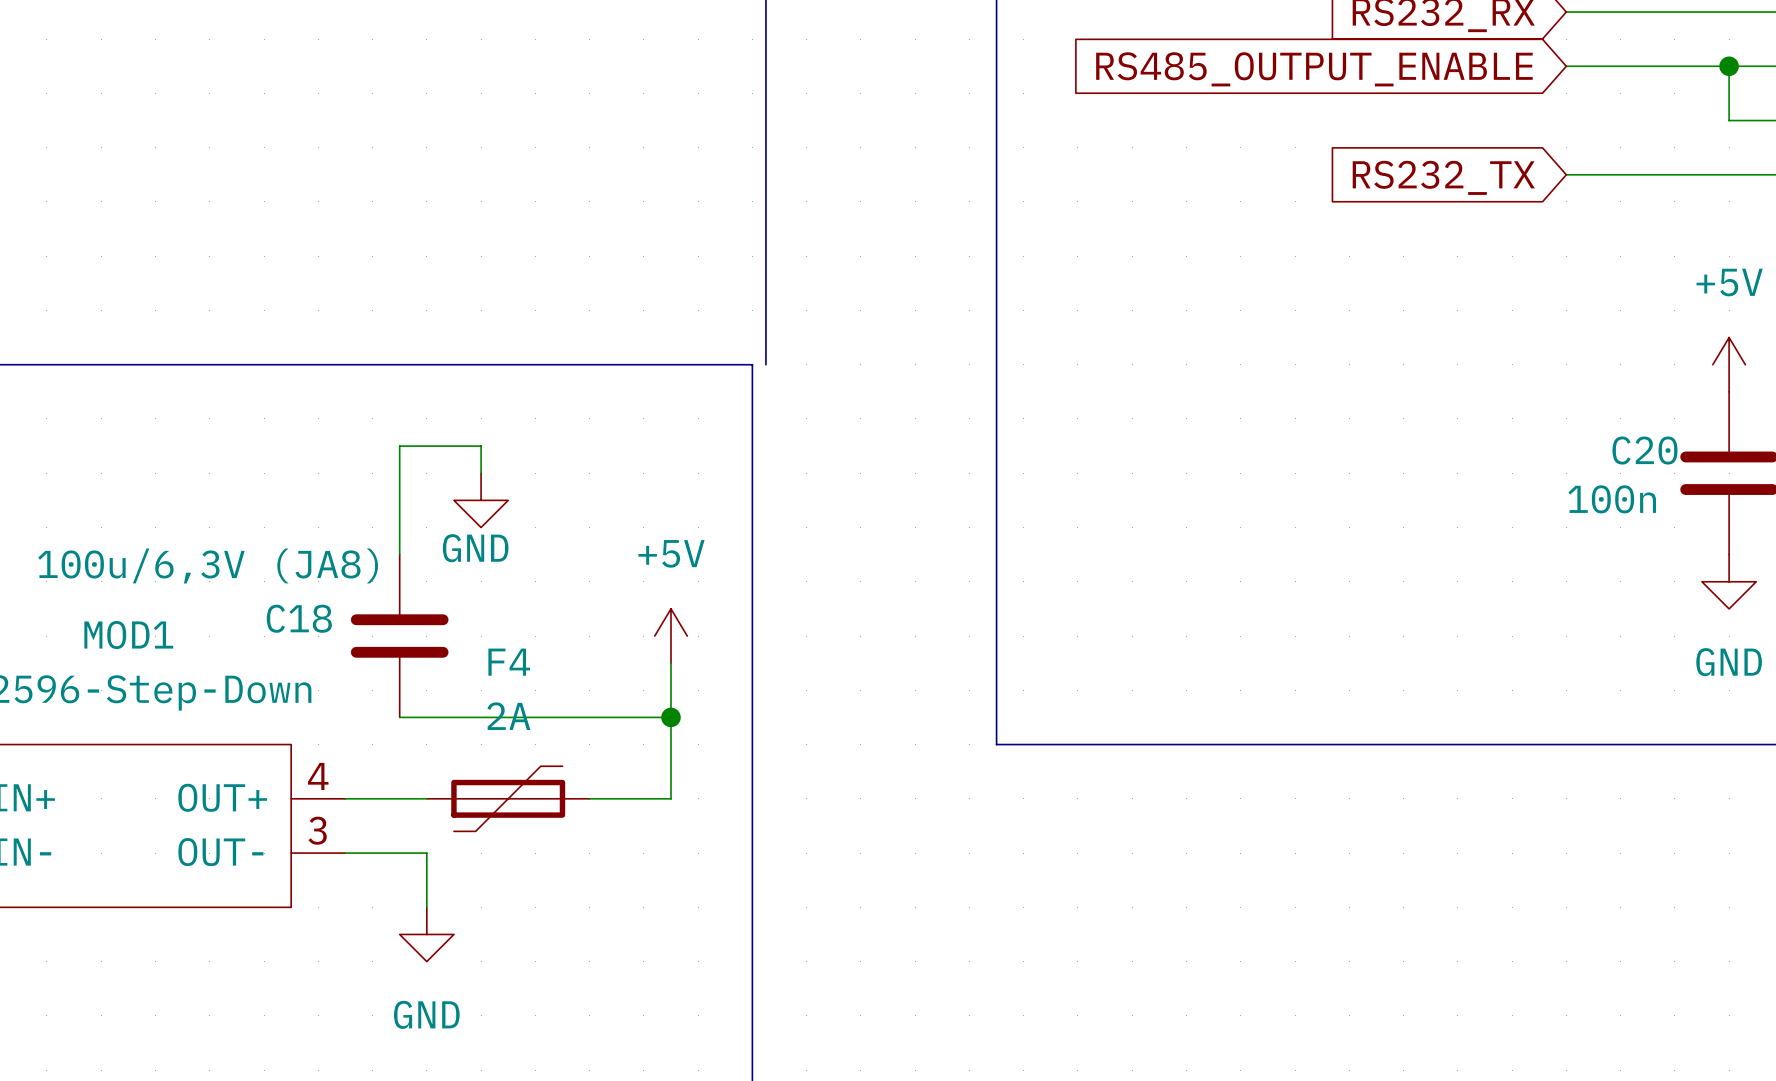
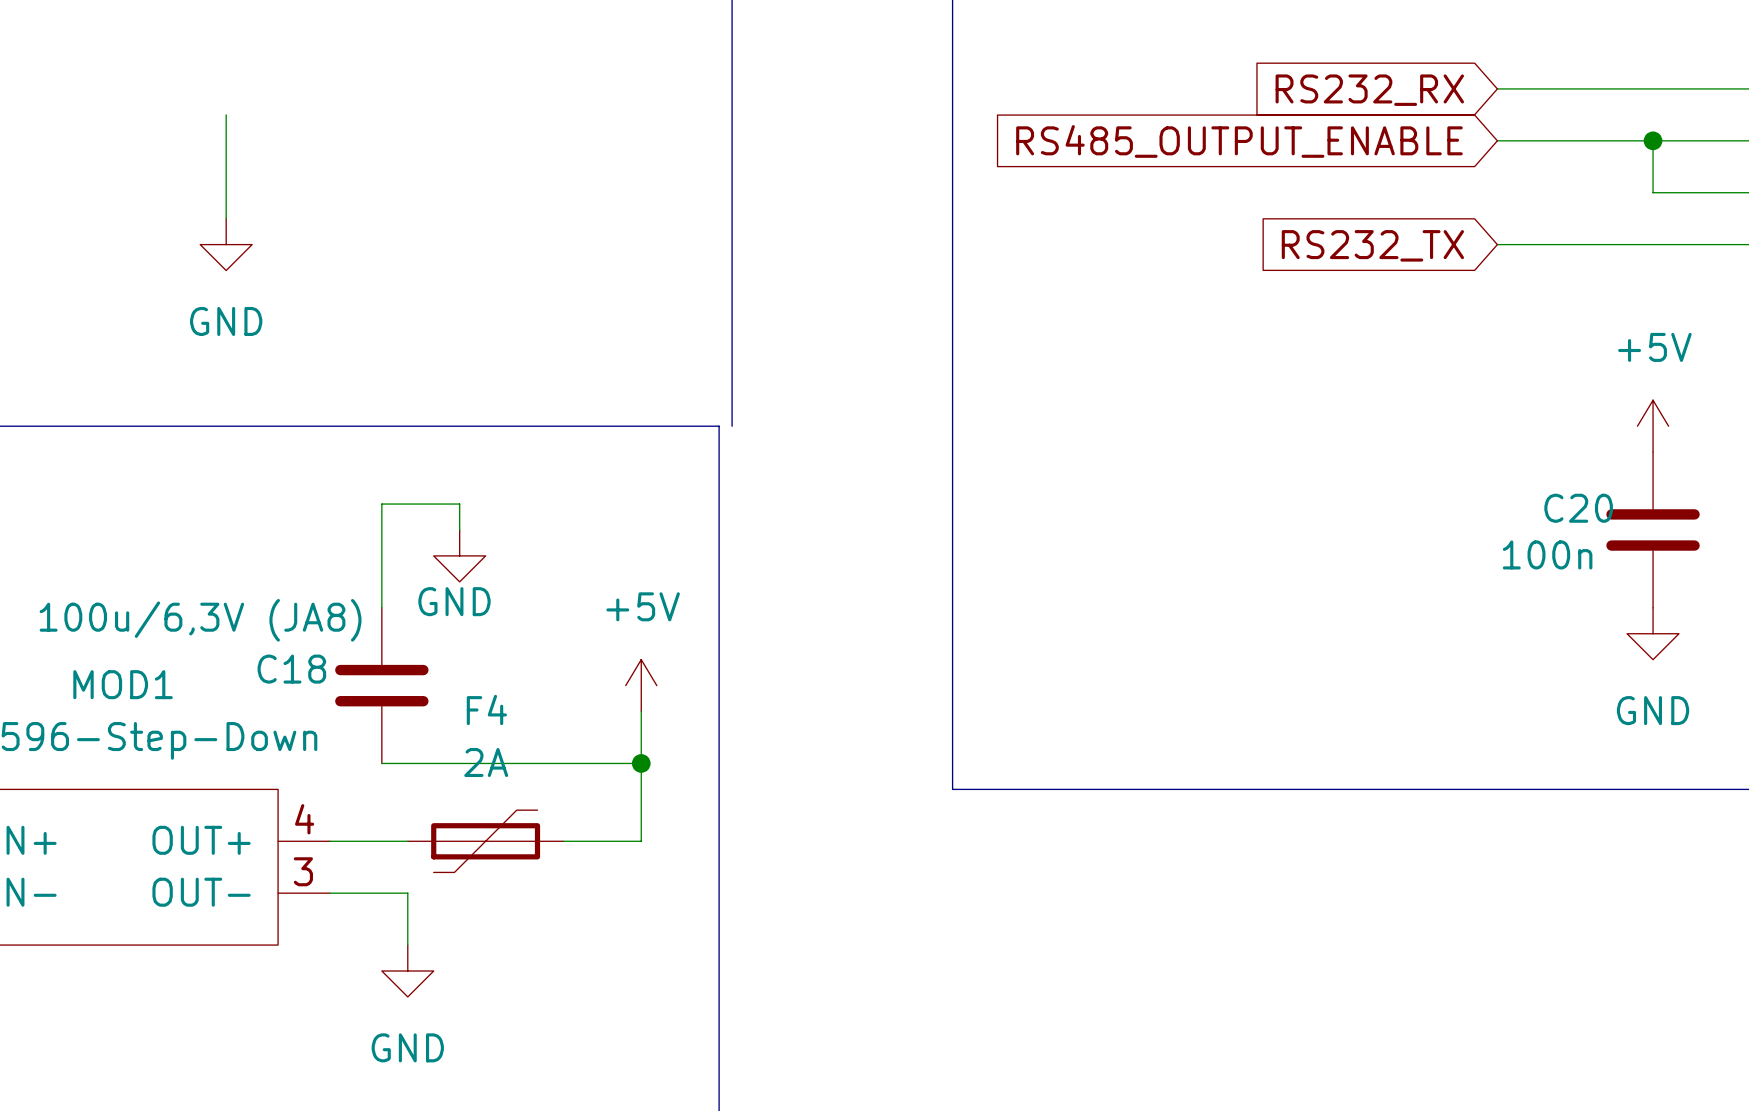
wire: none -> (226, 114) (226, 218)
power symbol: none -> GND (226, 244)

